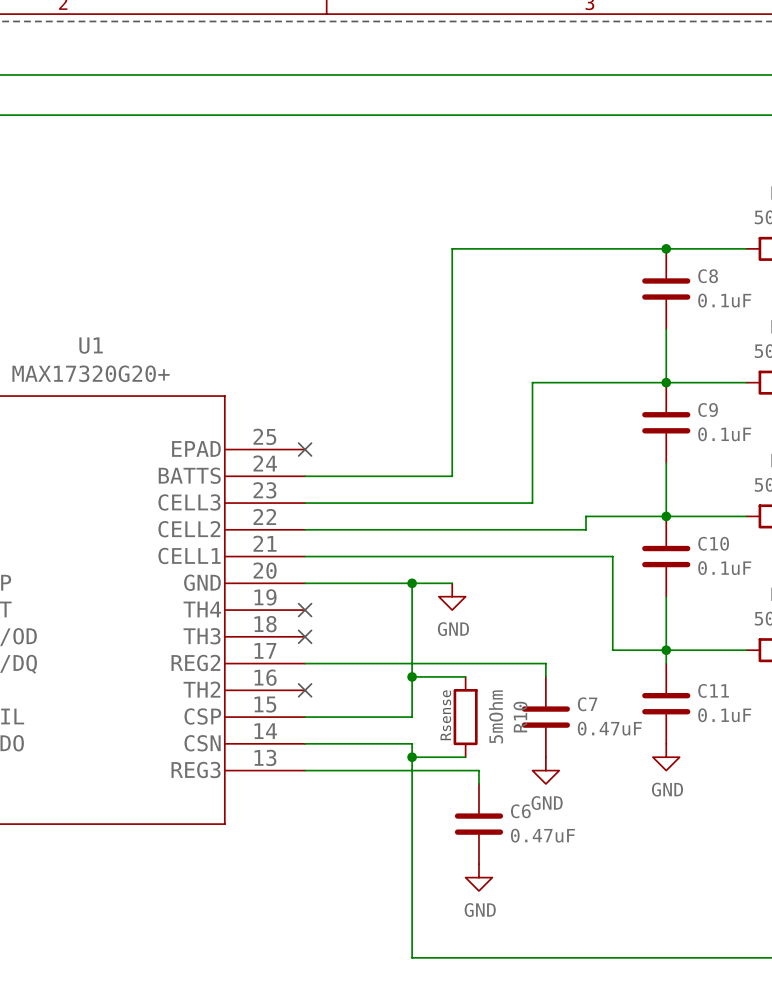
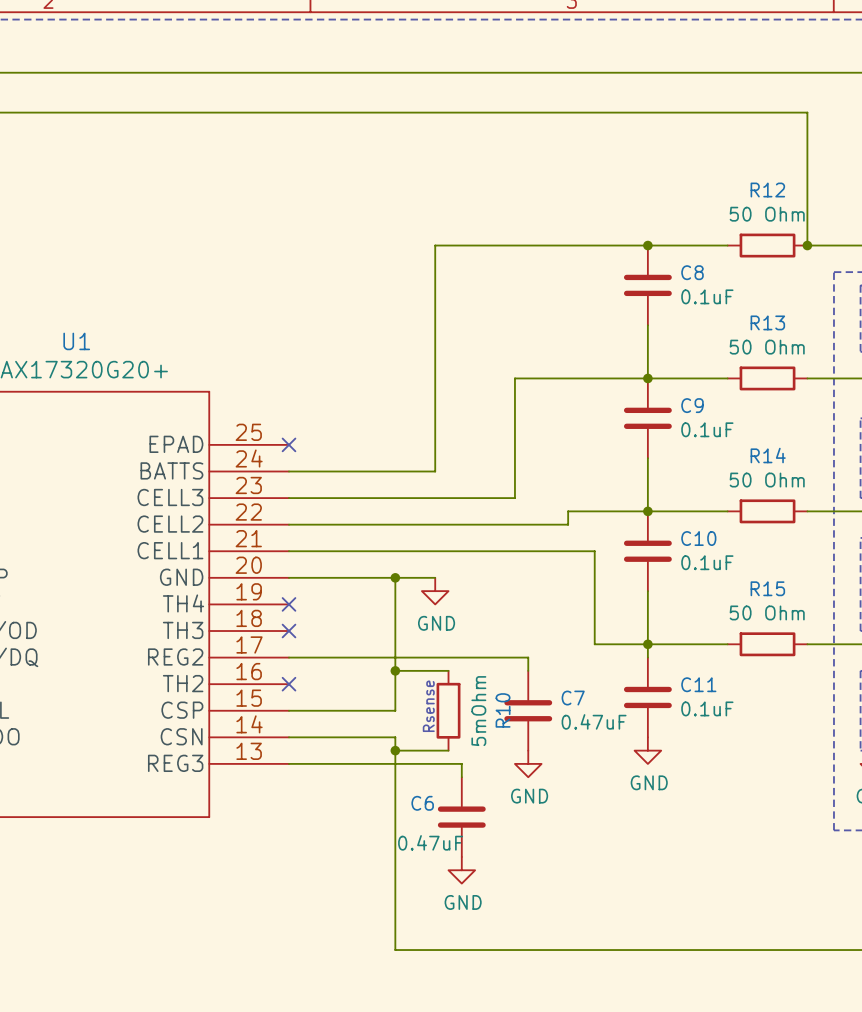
C6 name position: C6 (520, 811) -> C6 (422, 803)
C6 value position: 0.47uF (542, 835) -> 0.47uF (430, 842)

